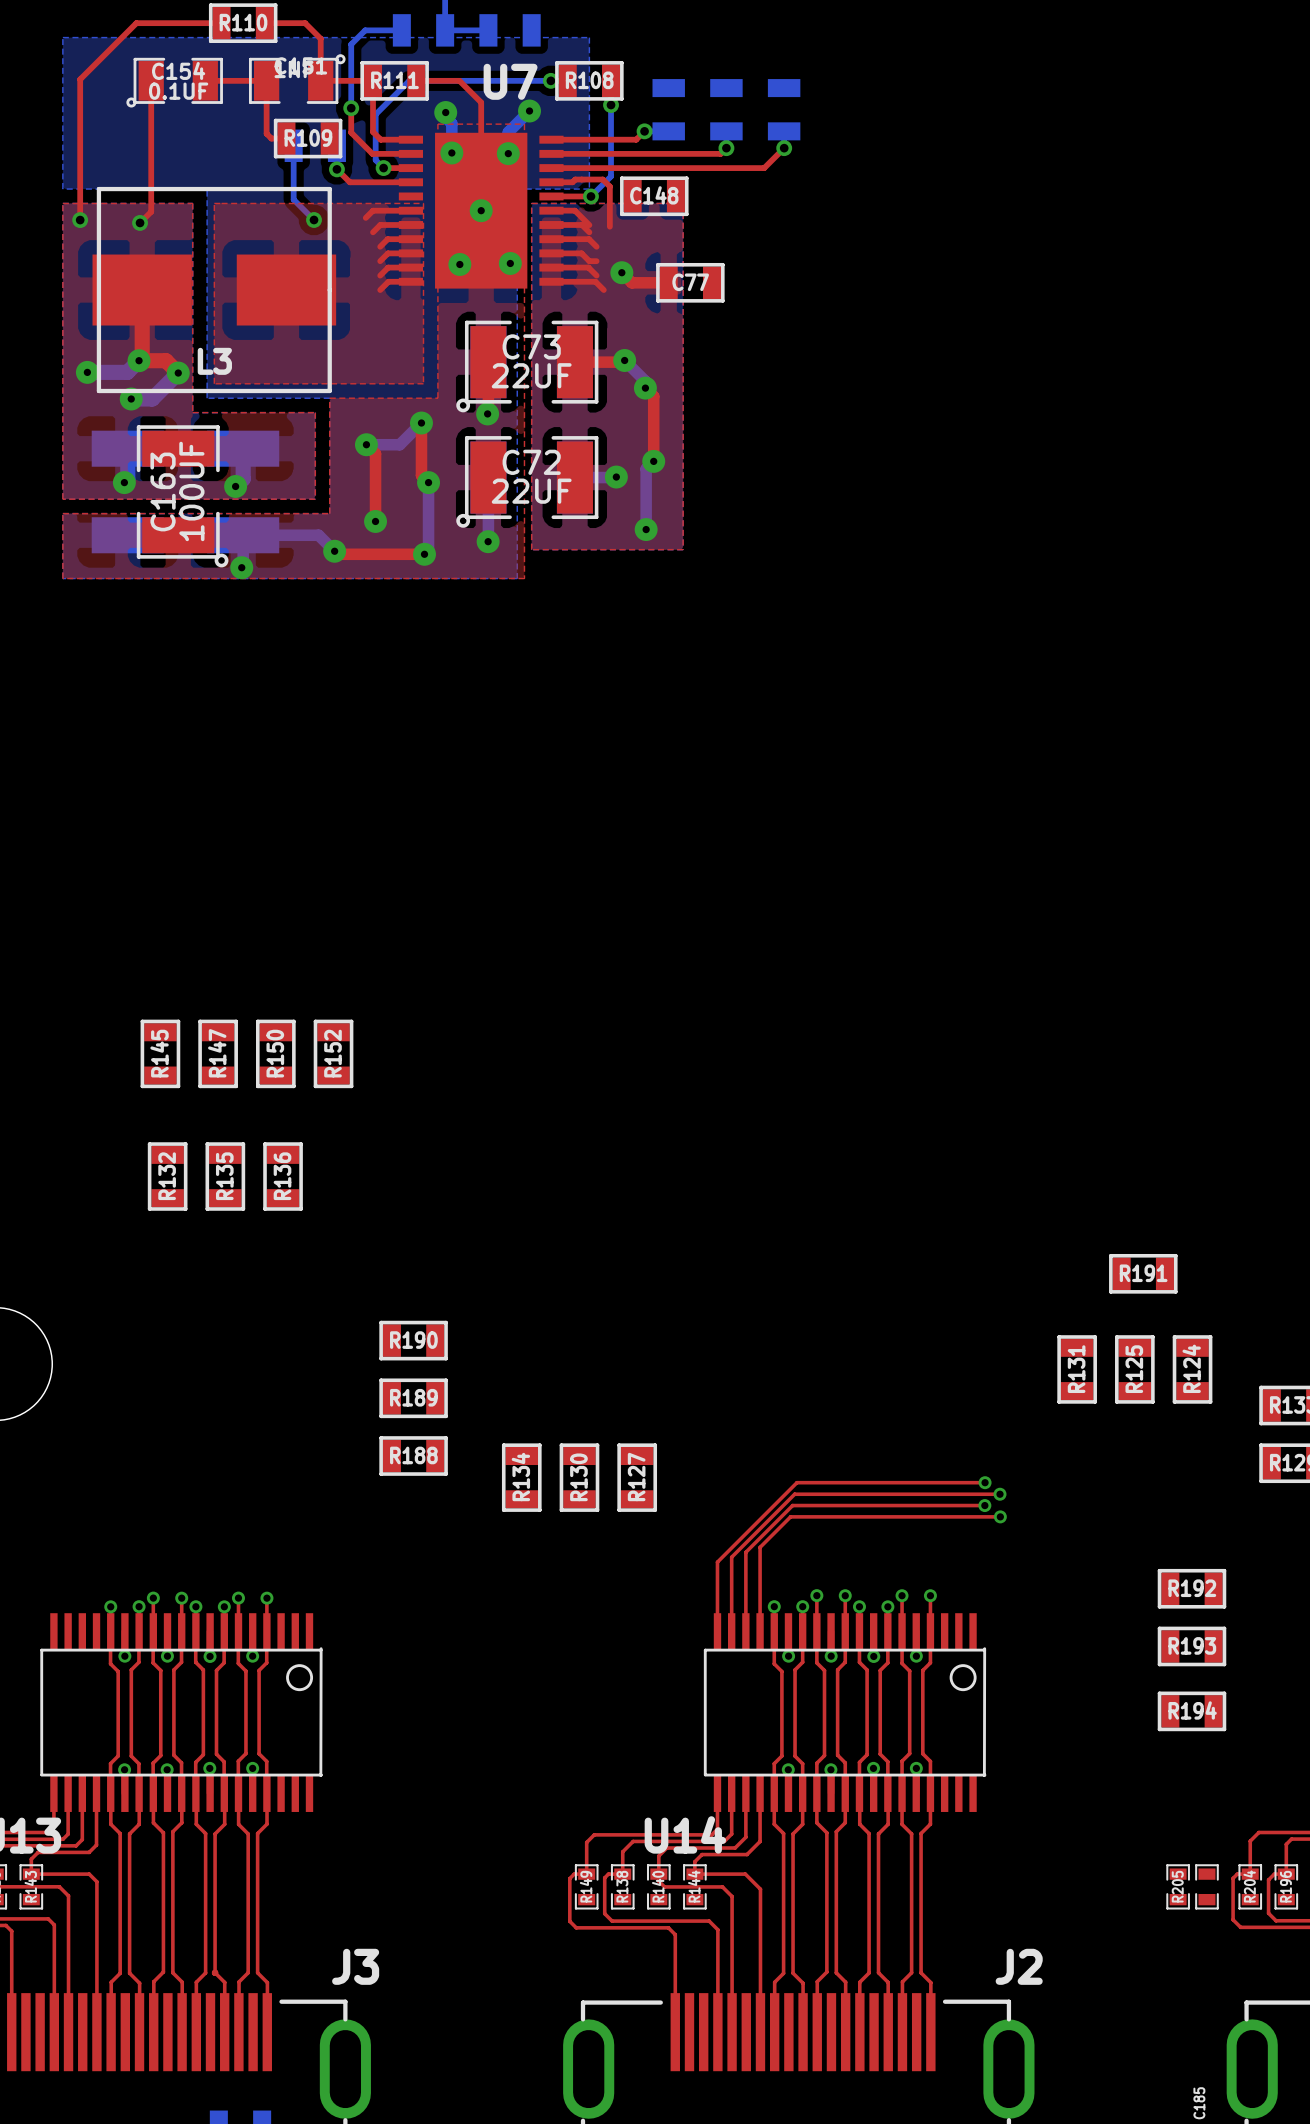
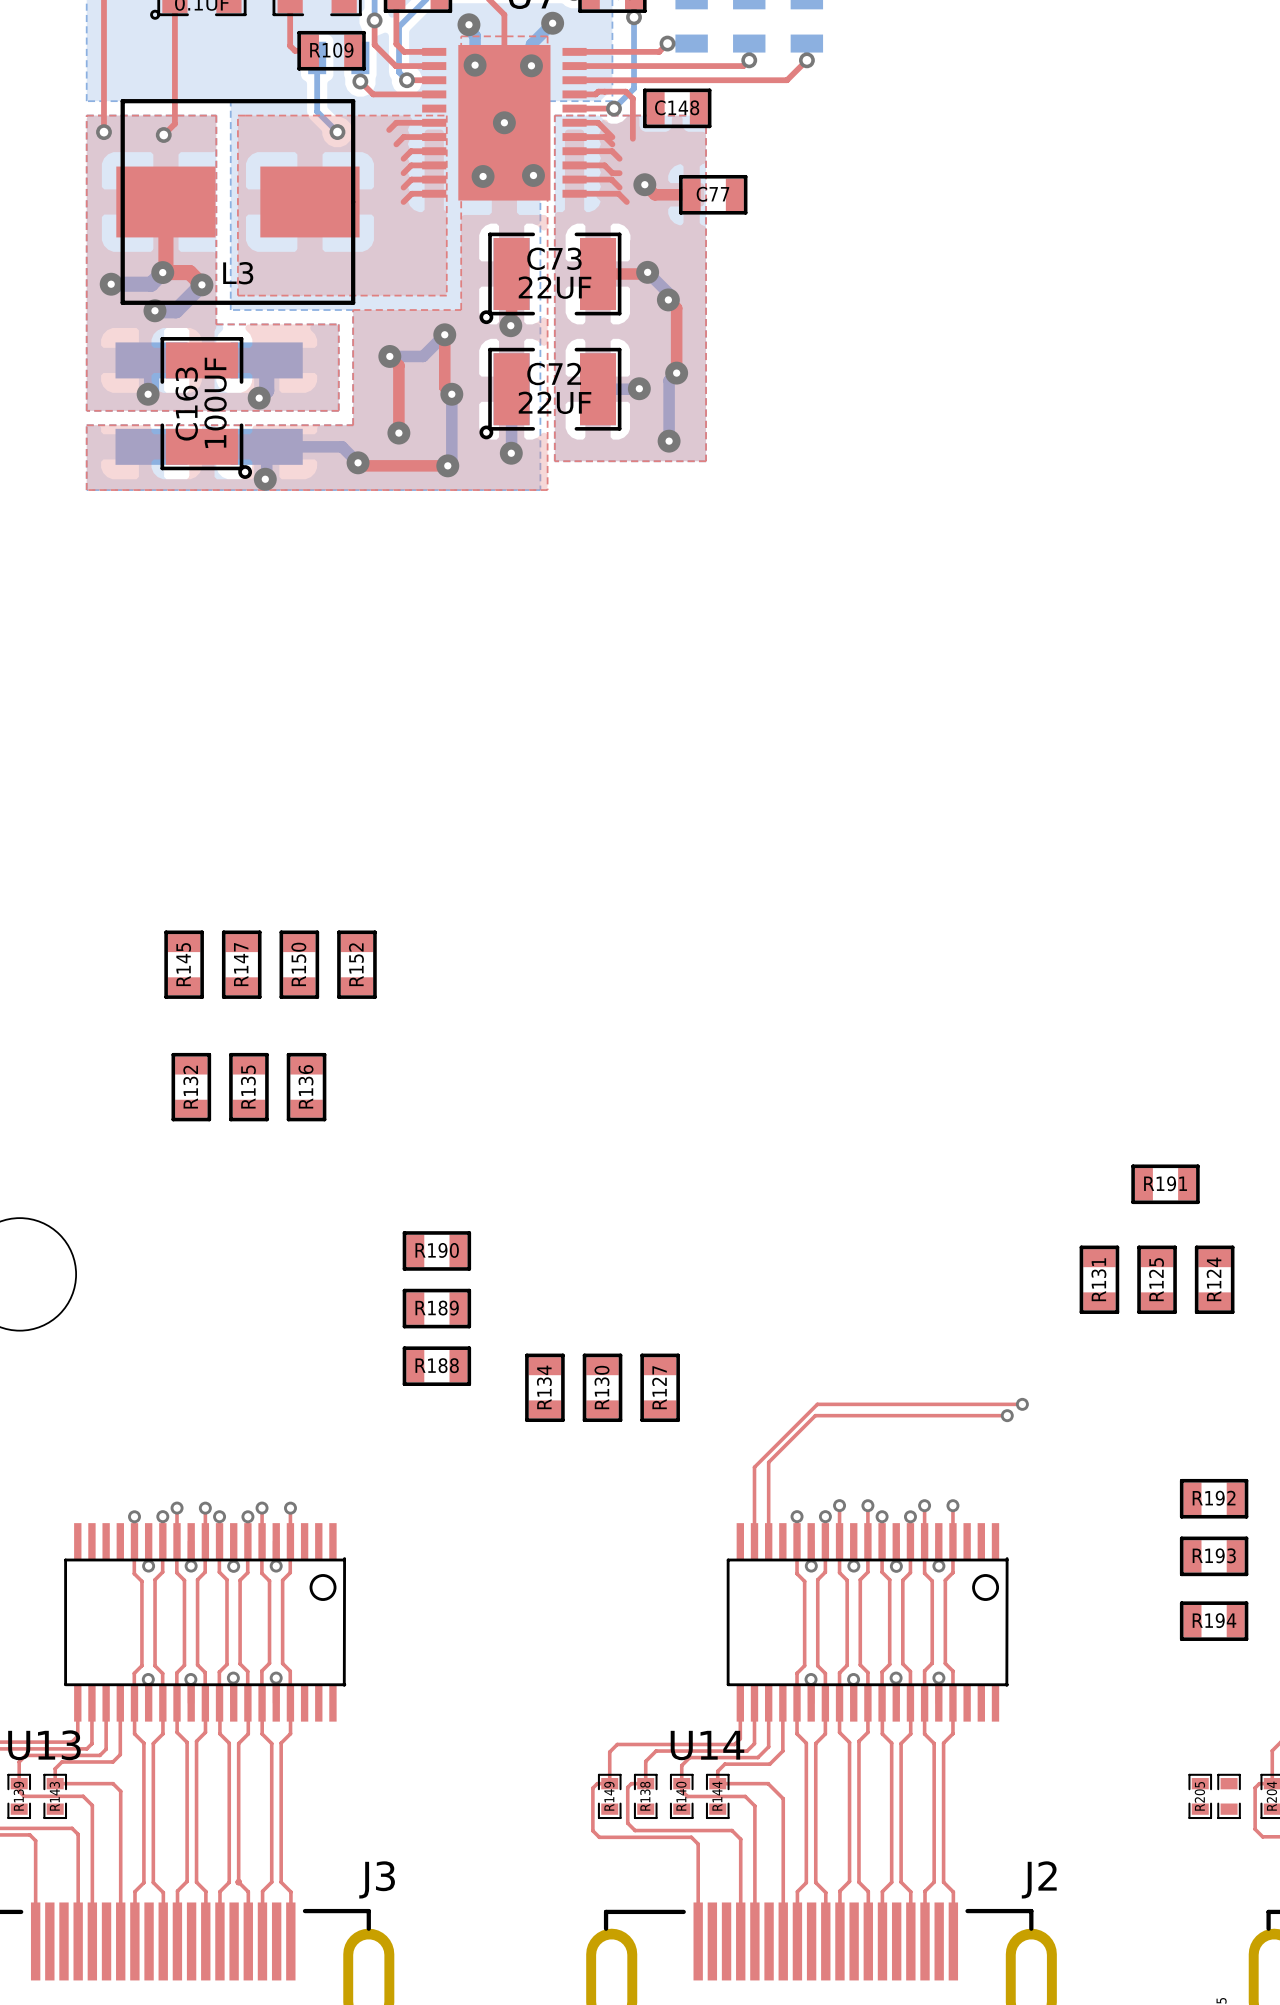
top track: (985, 1482) (796, 1482) (717, 1562) (717, 1631) -> none
via: (985, 1482) -> none
top track: (1000, 1516) (790, 1516) (760, 1547) (760, 1631) -> none
via: (1000, 1516) -> none

